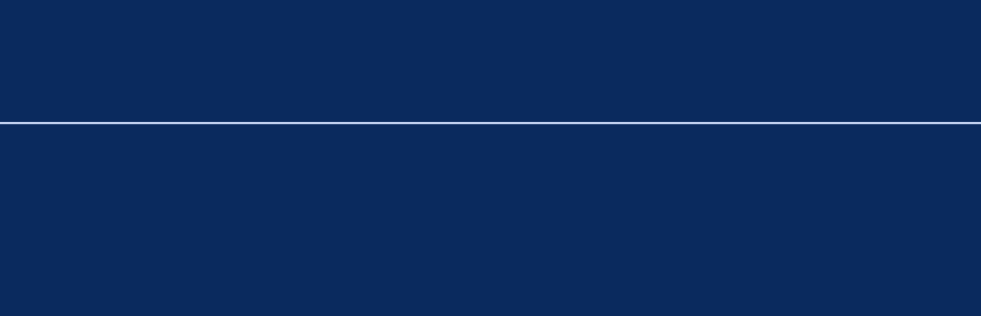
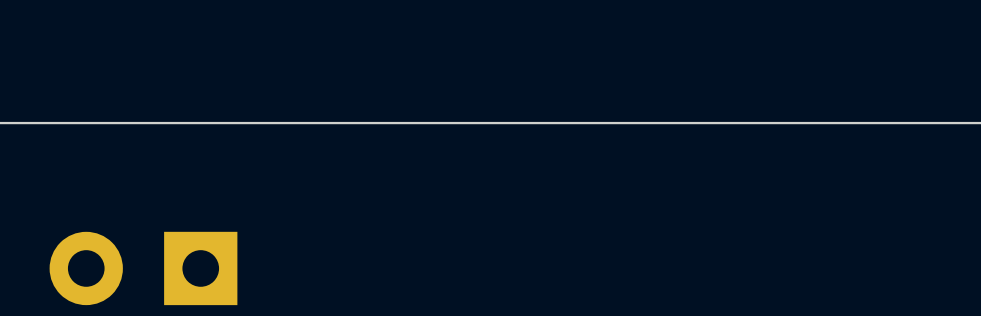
part: none -> (143, 268)

